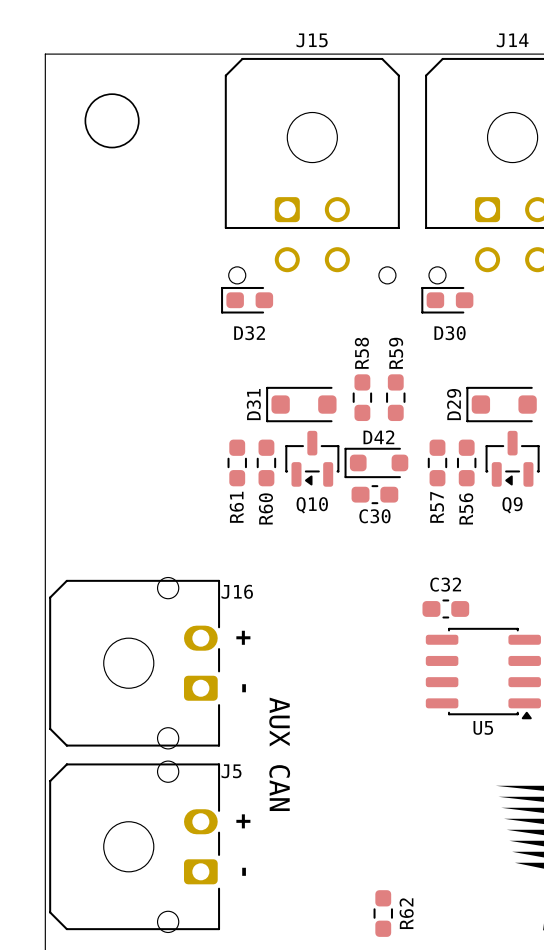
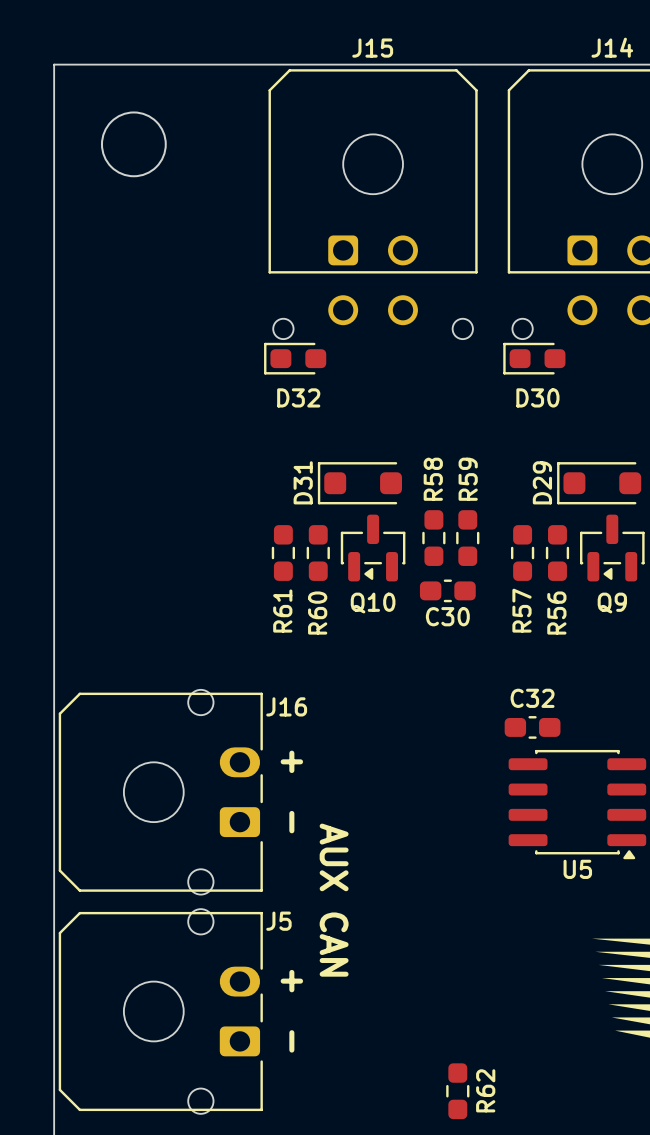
R58 position: (362, 397) -> (433, 538)
R59 position: (395, 397) -> (467, 538)
D42: (376, 462) -> none

